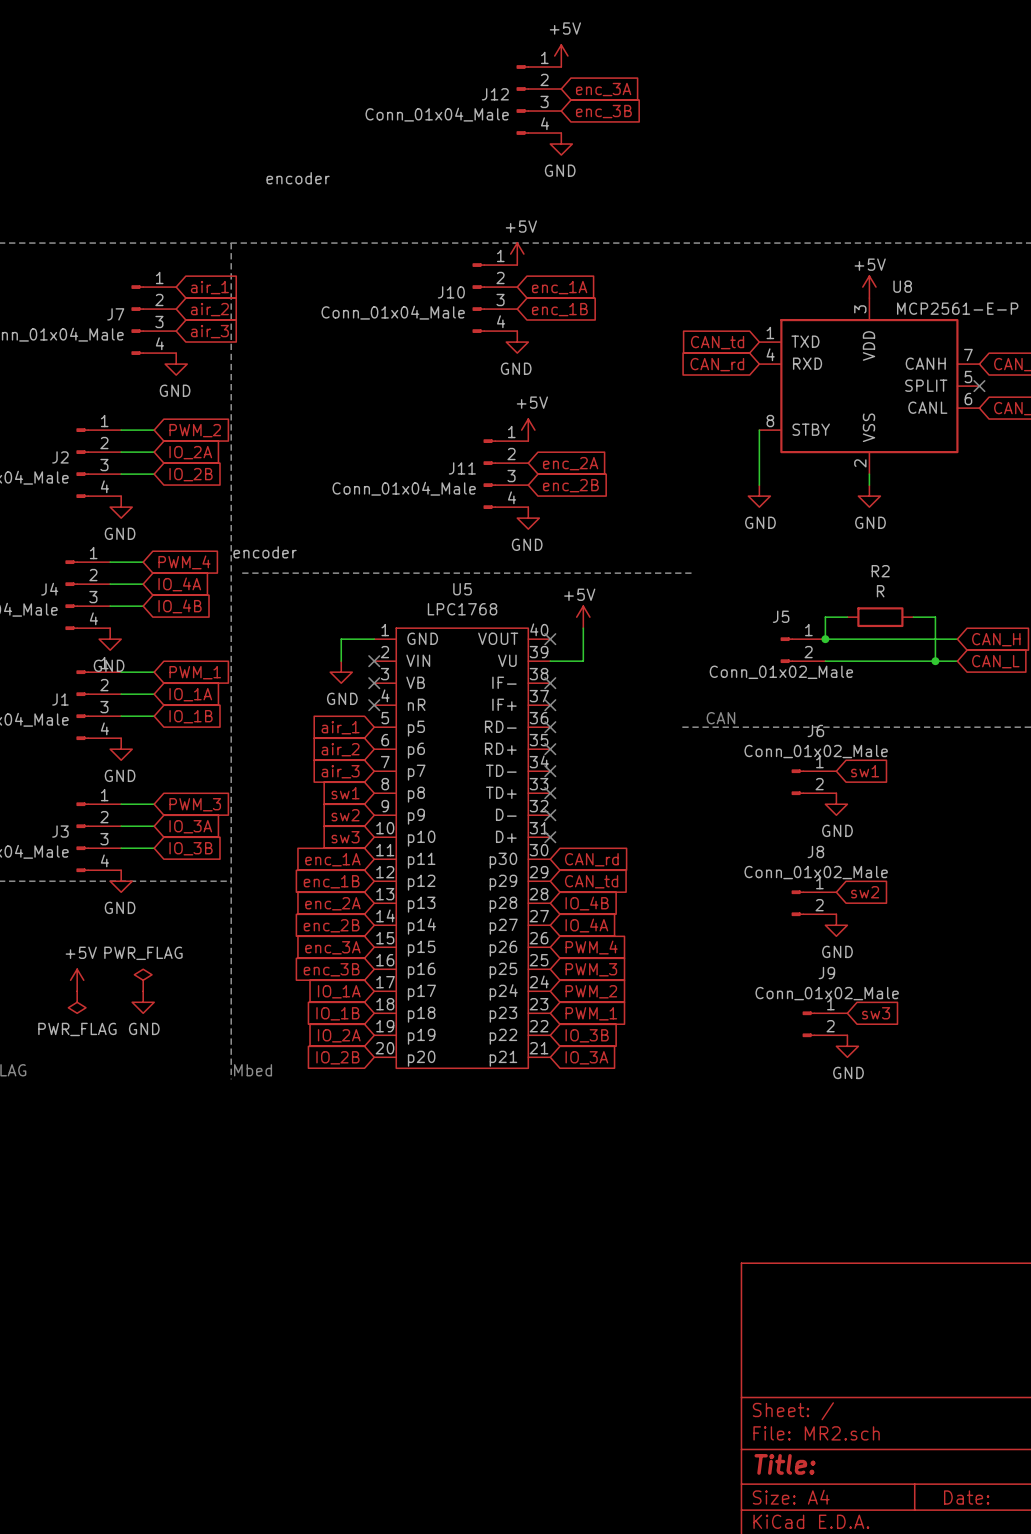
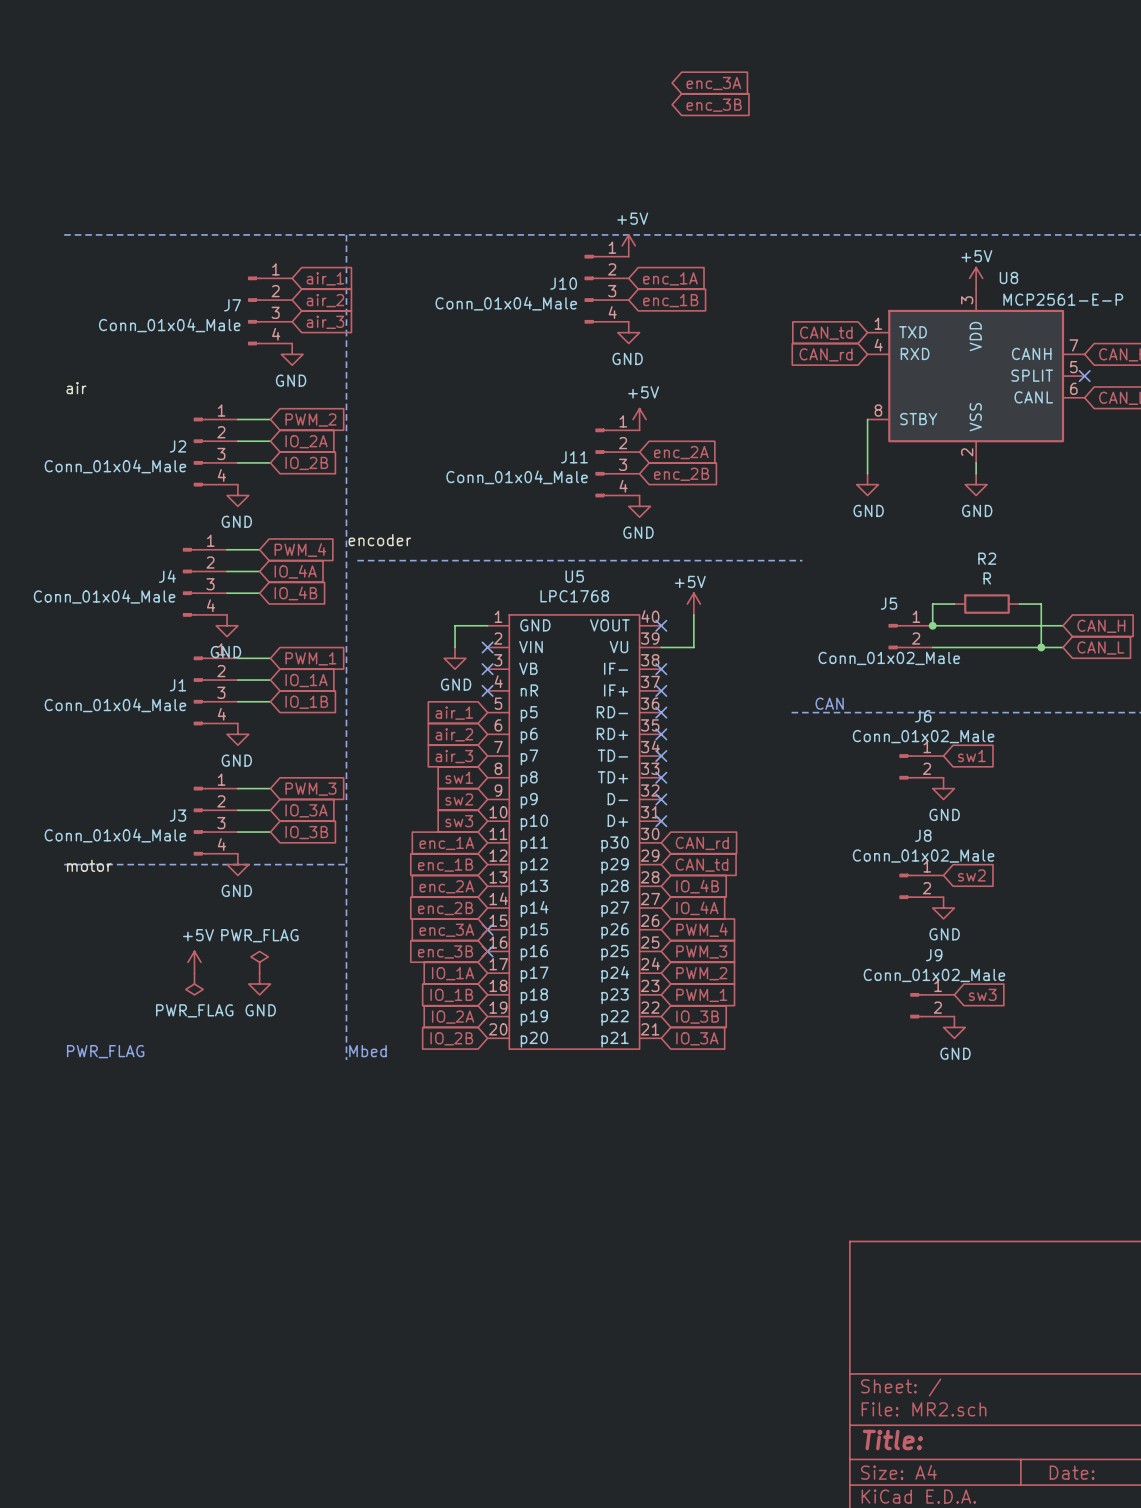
power symbol: +5V (561, 56) -> none
J12: Conn_01x04_Male (538, 100) -> none
power symbol: GND (561, 144) -> none
label: encoder (298, 178) -> none
no-connect mark: none -> (487, 929)
no-connect mark: none -> (487, 951)

